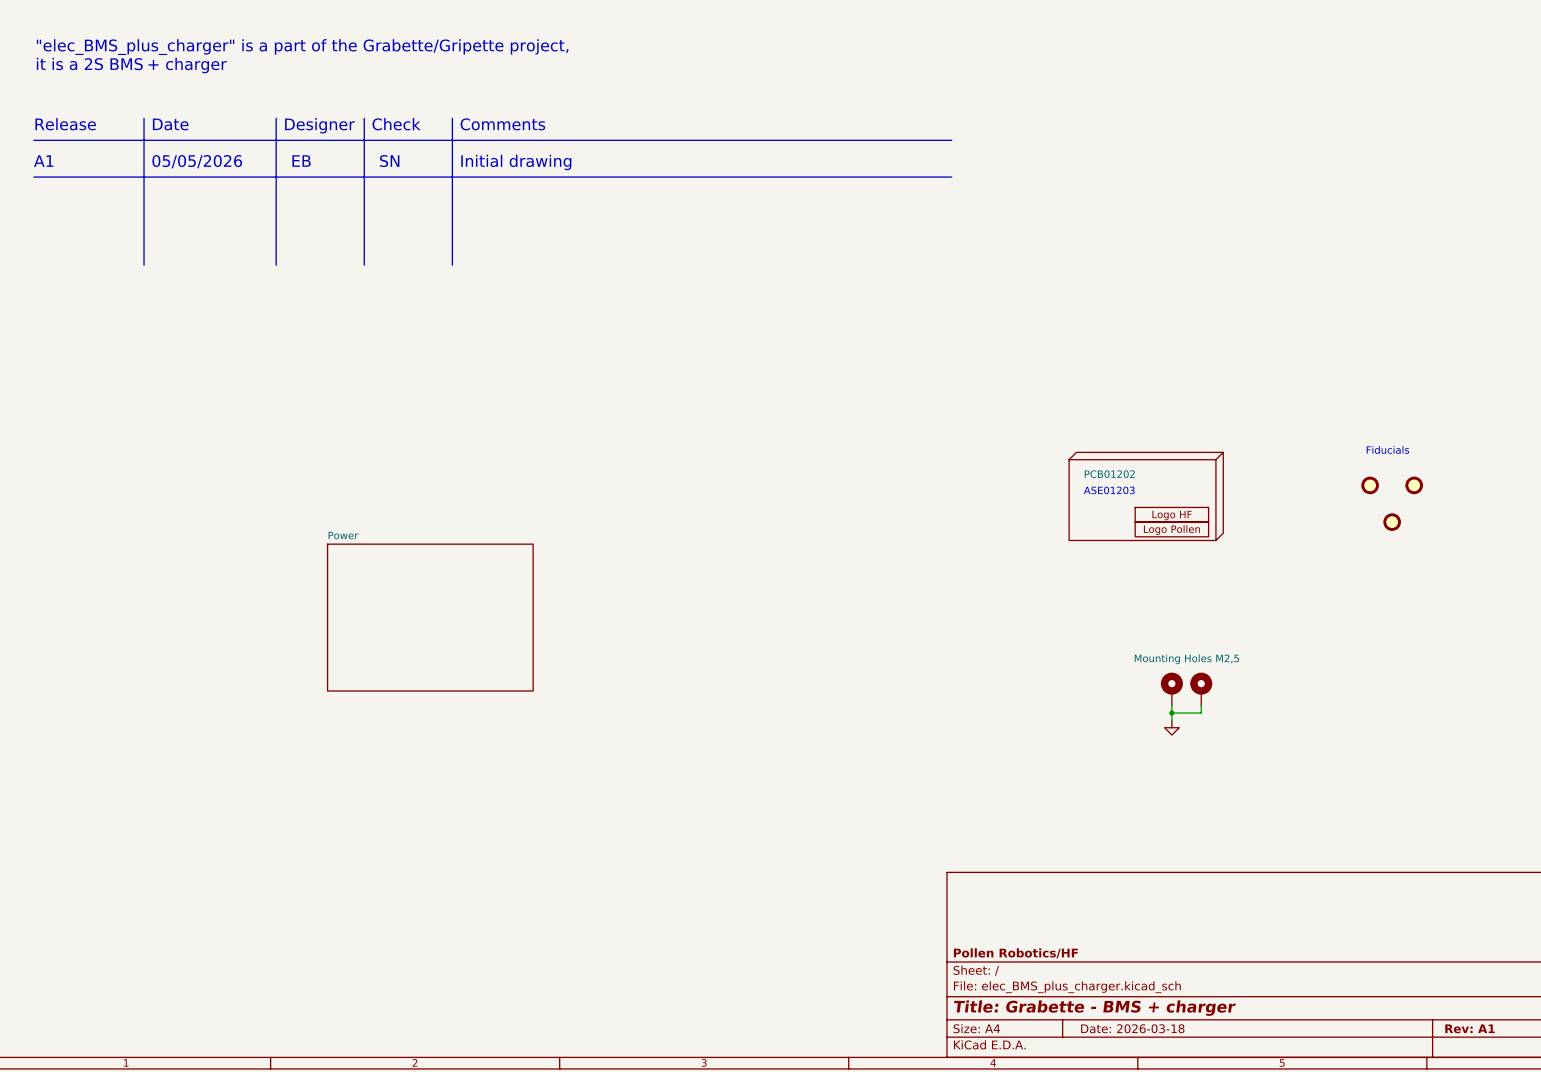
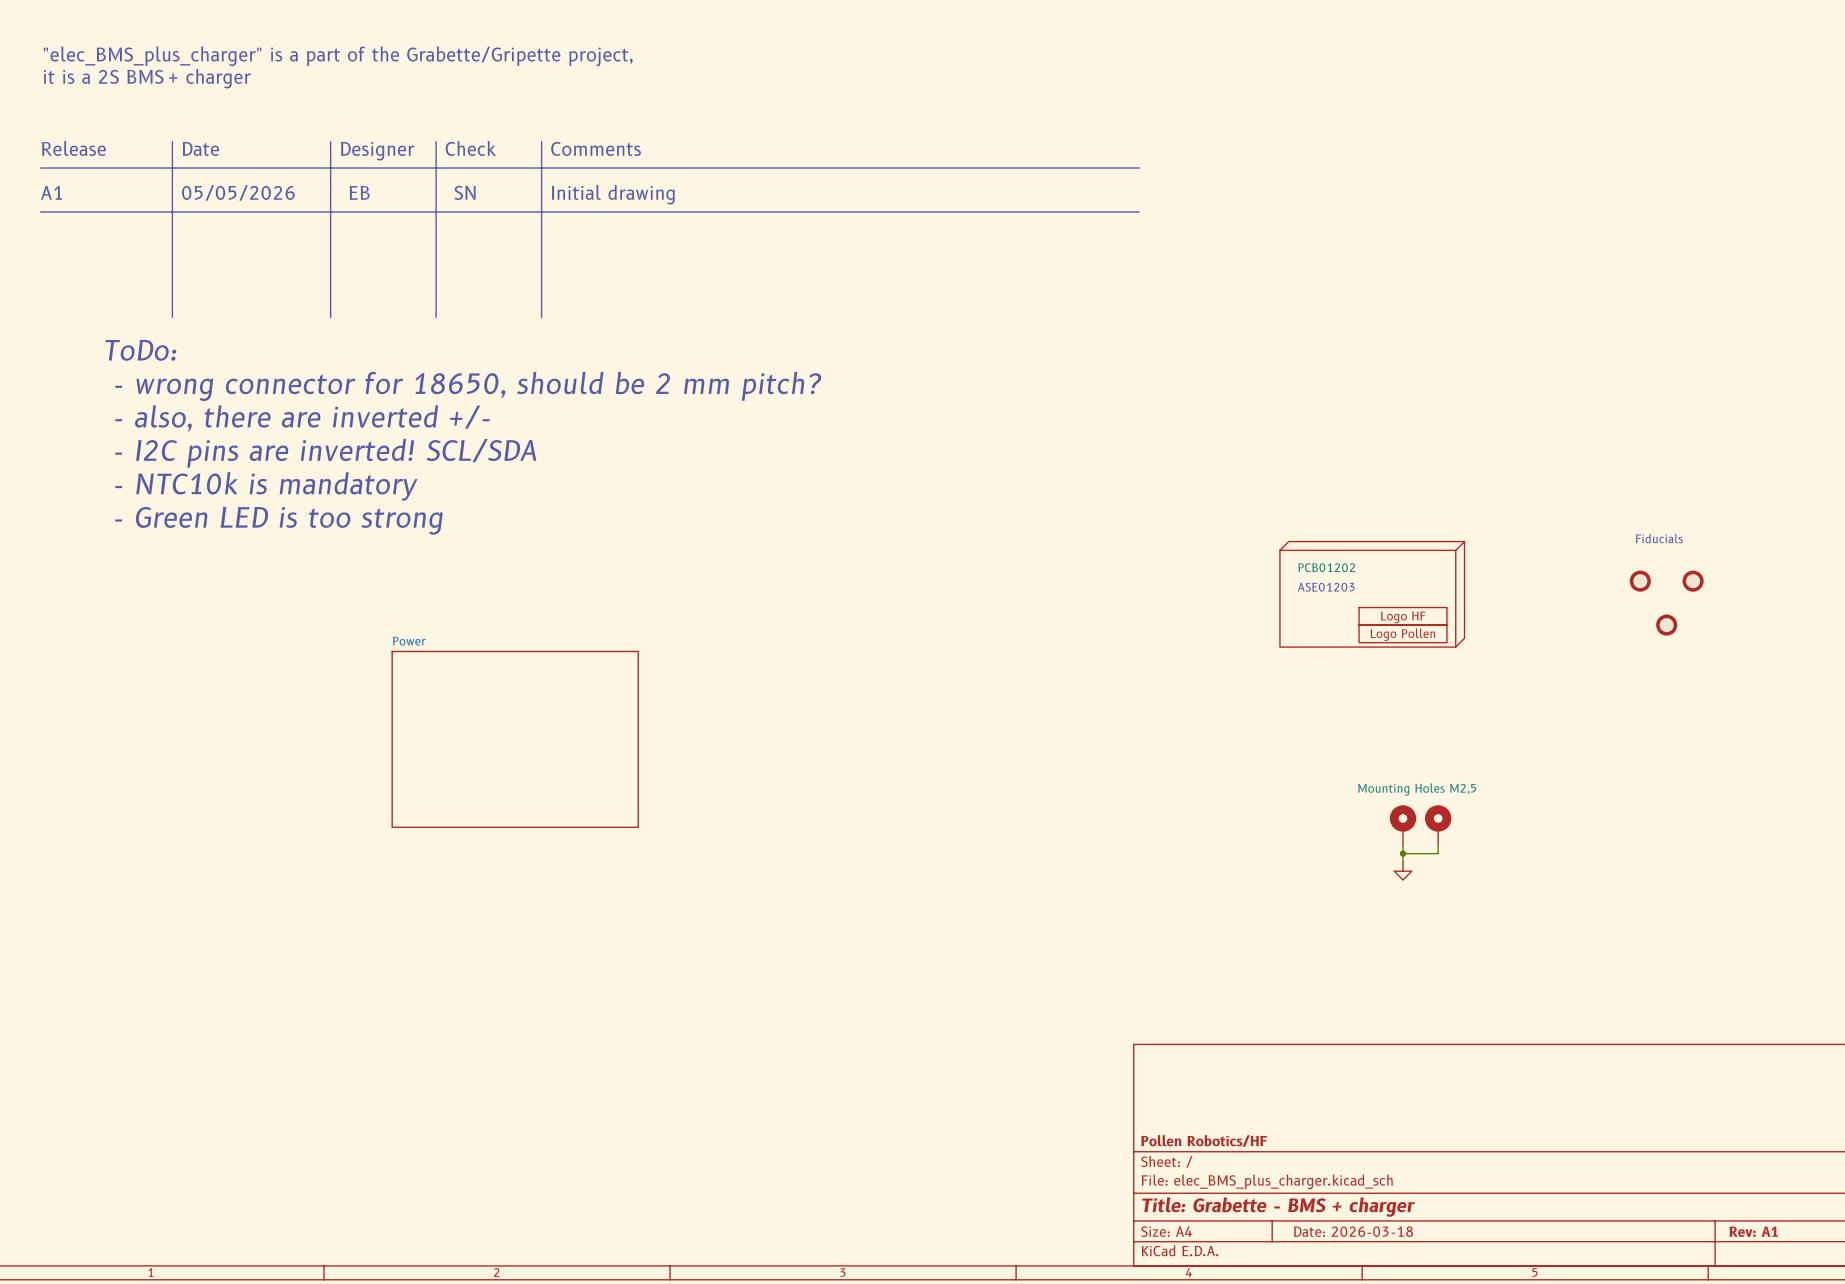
text: none -> ToDo: (140, 350)
text: none -> - wrong connector for 18650, should be 2 mm pitch? (468, 386)
text: none -> - also, there are inverted +/- (302, 418)
text: none -> - I2C pins are inverted! SCL/SDA (325, 453)
text: none -> - NTC10k is mandatory (266, 486)
text: none -> - Green LED is too strong (278, 520)

